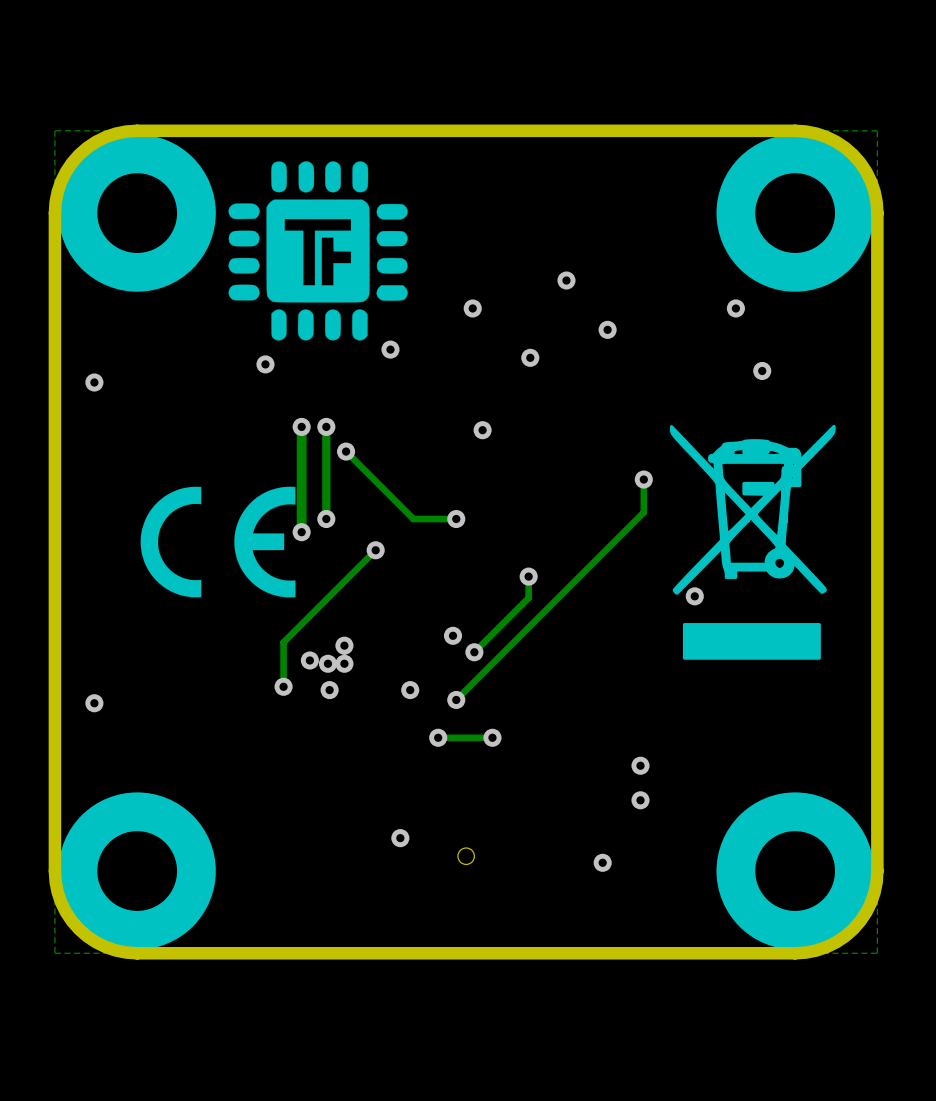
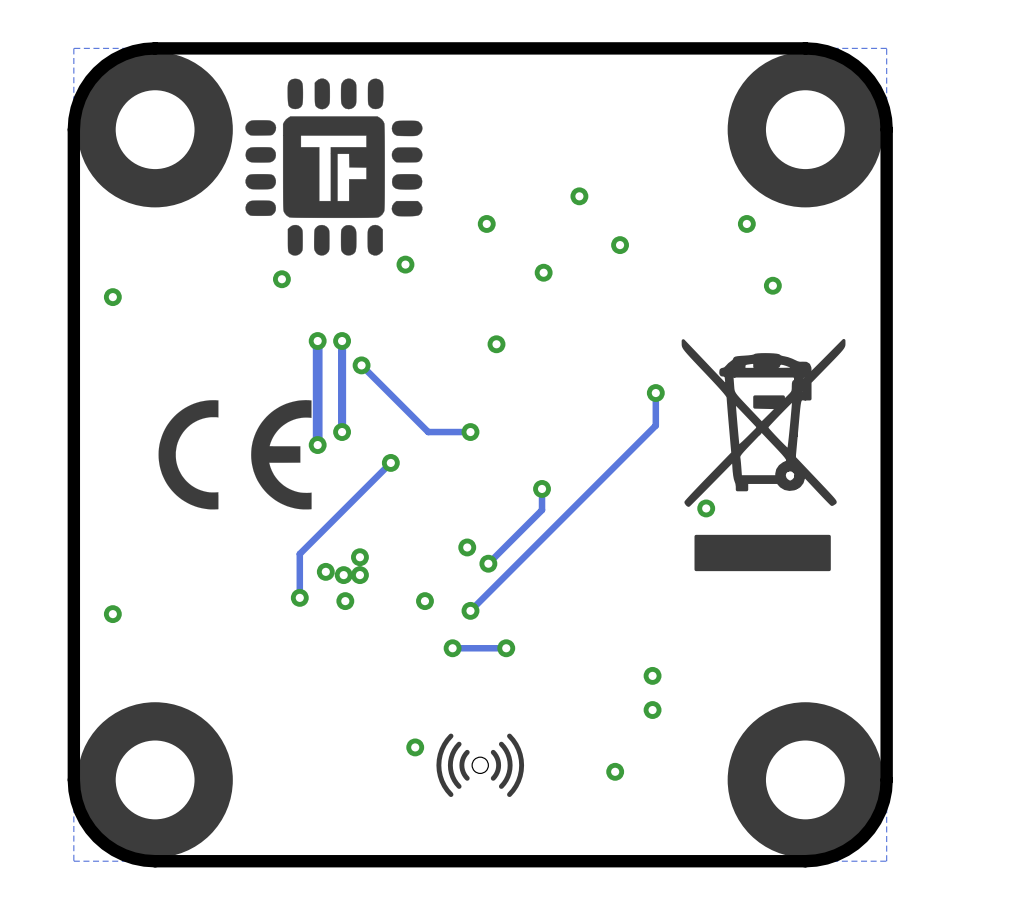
line: none -> (450, 736) (442, 749) (438, 765) (442, 781) (450, 794)
line: none -> (509, 736) (518, 749) (521, 765) (518, 781) (509, 794)
line: none -> (459, 744) (452, 753) (450, 765) (452, 776) (459, 786)
line: none -> (501, 744) (507, 753) (510, 765) (507, 776) (501, 786)
line: none -> (467, 752) (461, 765) (467, 778)
line: none -> (493, 752) (498, 765) (493, 778)

